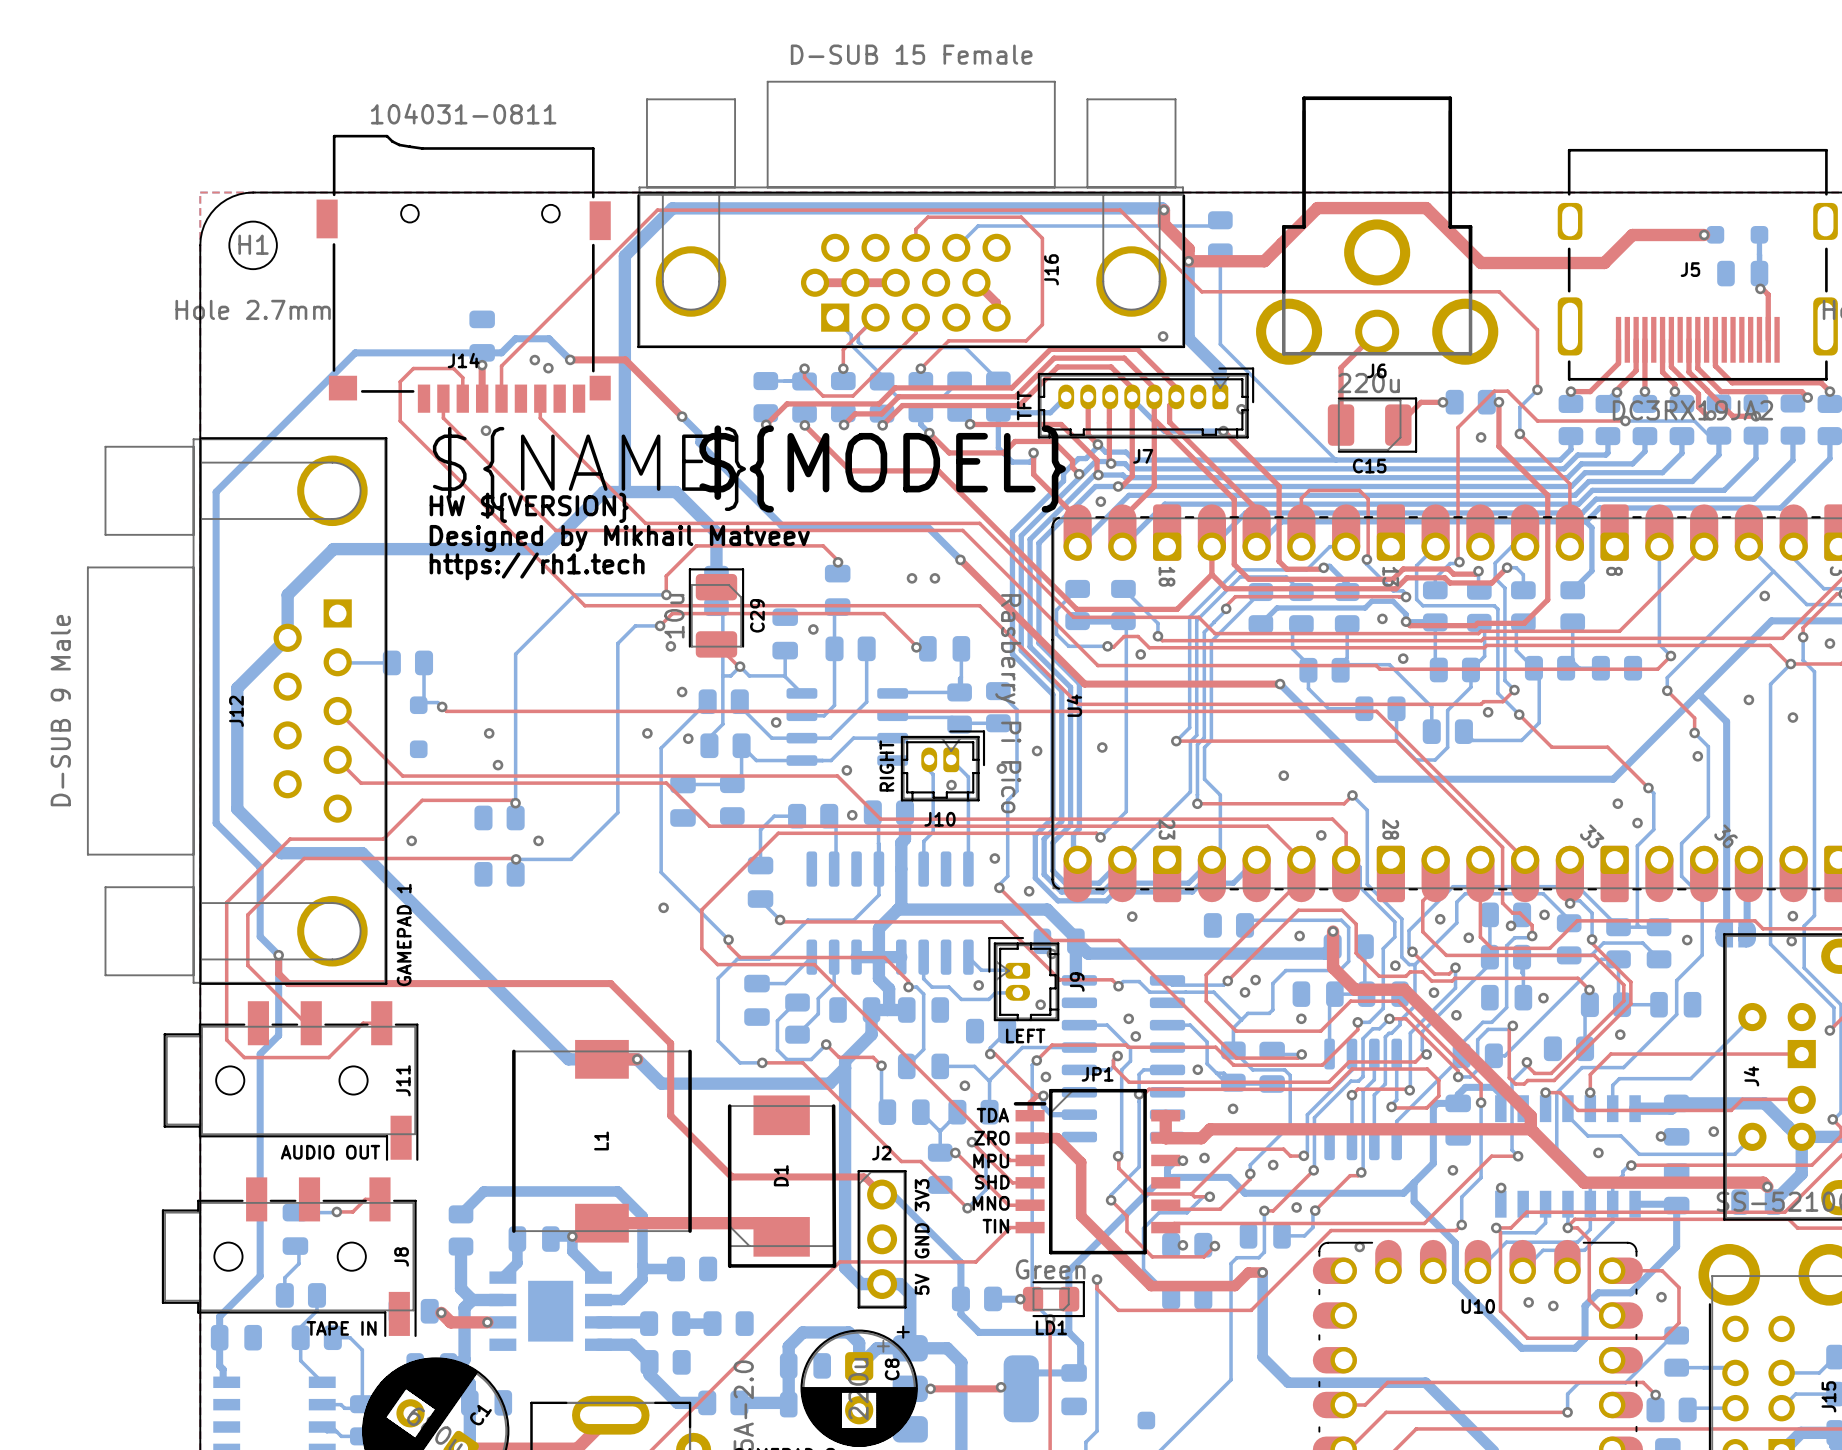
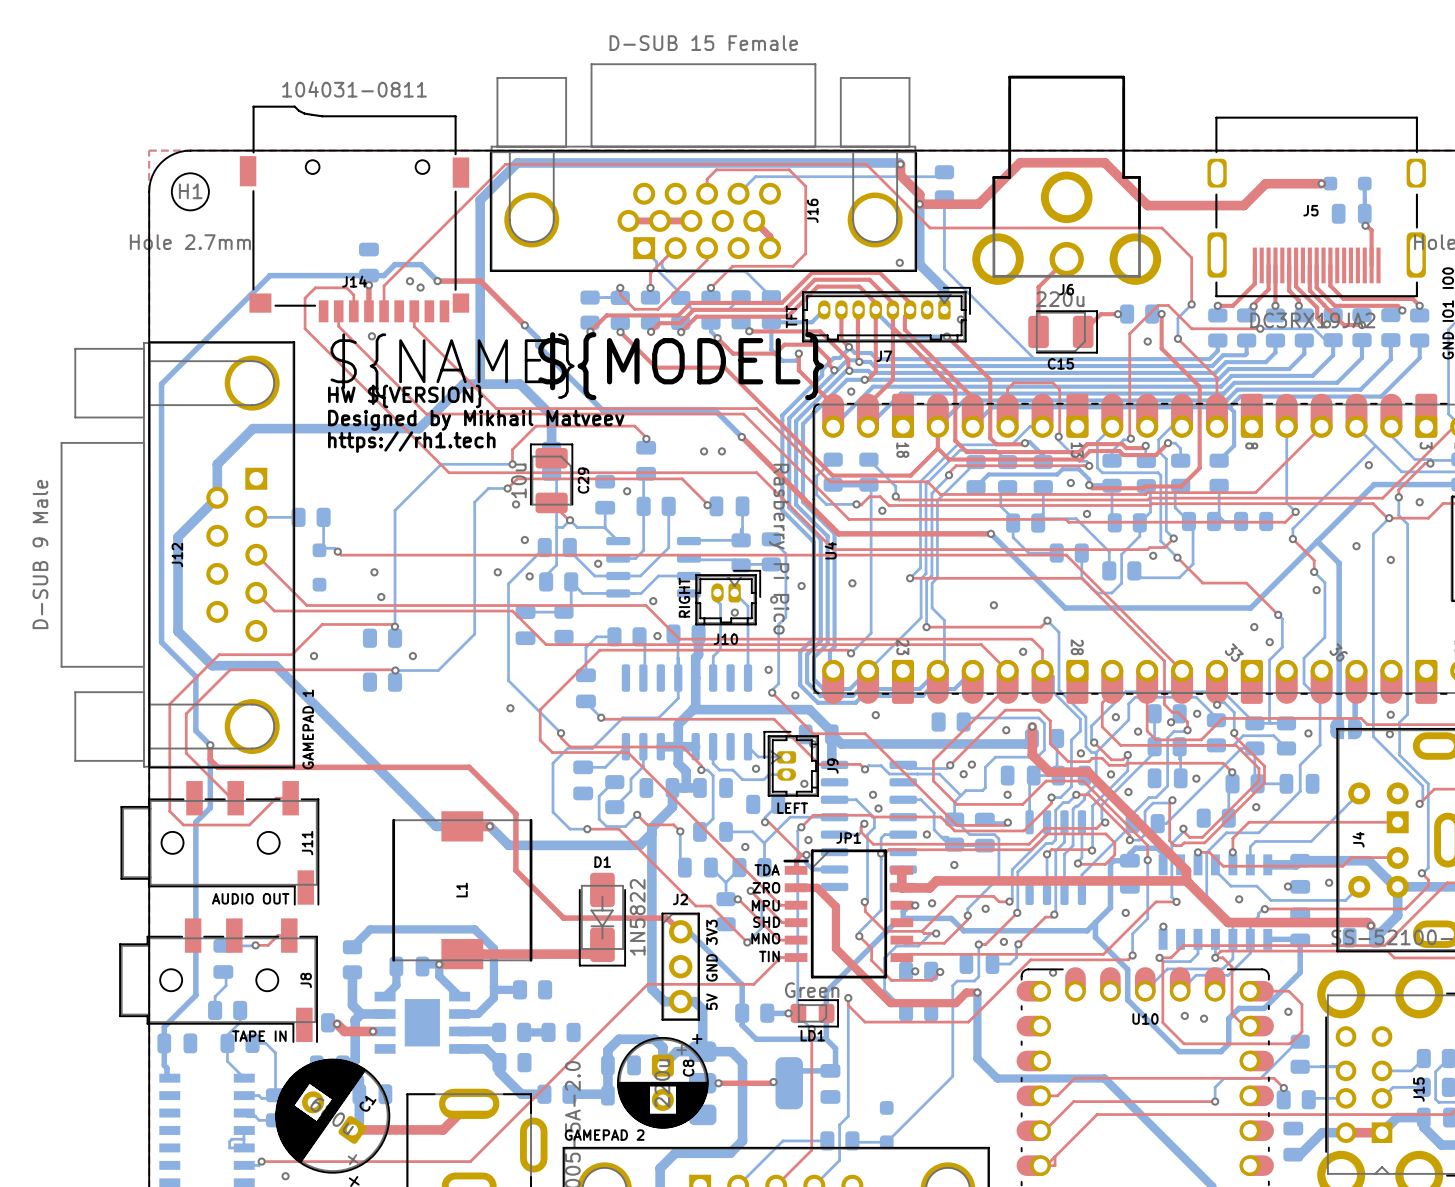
D1 footprint: [727, 1095, 837, 1268] -> [578, 872, 626, 967]
D1 name position: D1 (781, 1175) -> D1 (602, 862)
D1 value: none -> 1N5822 (637, 917)

